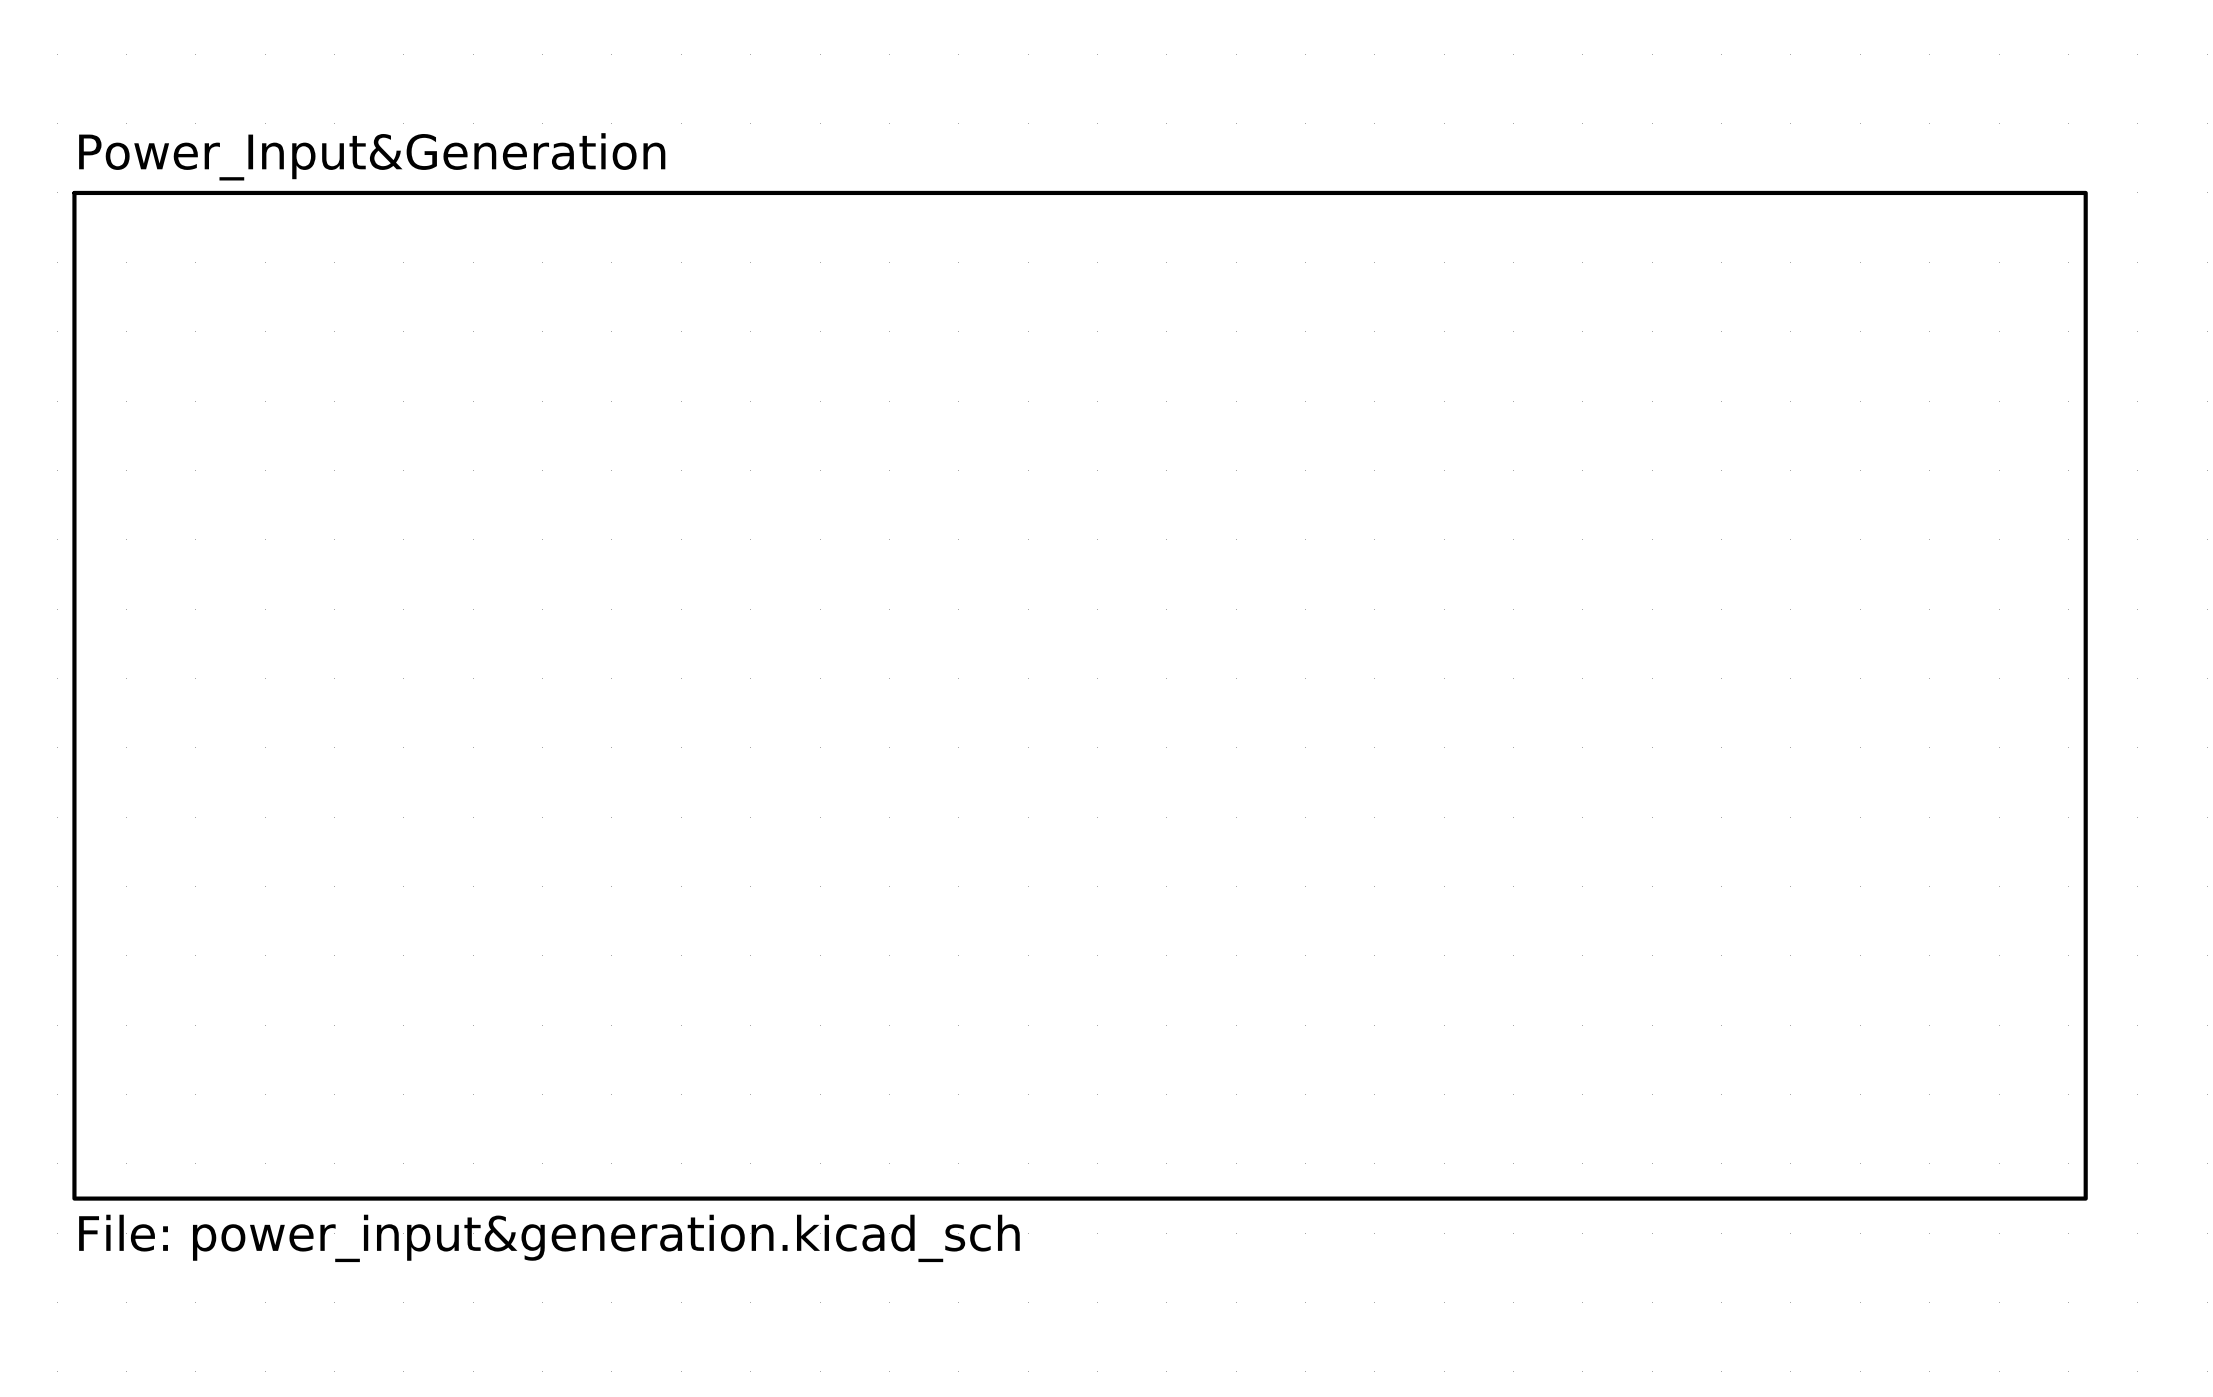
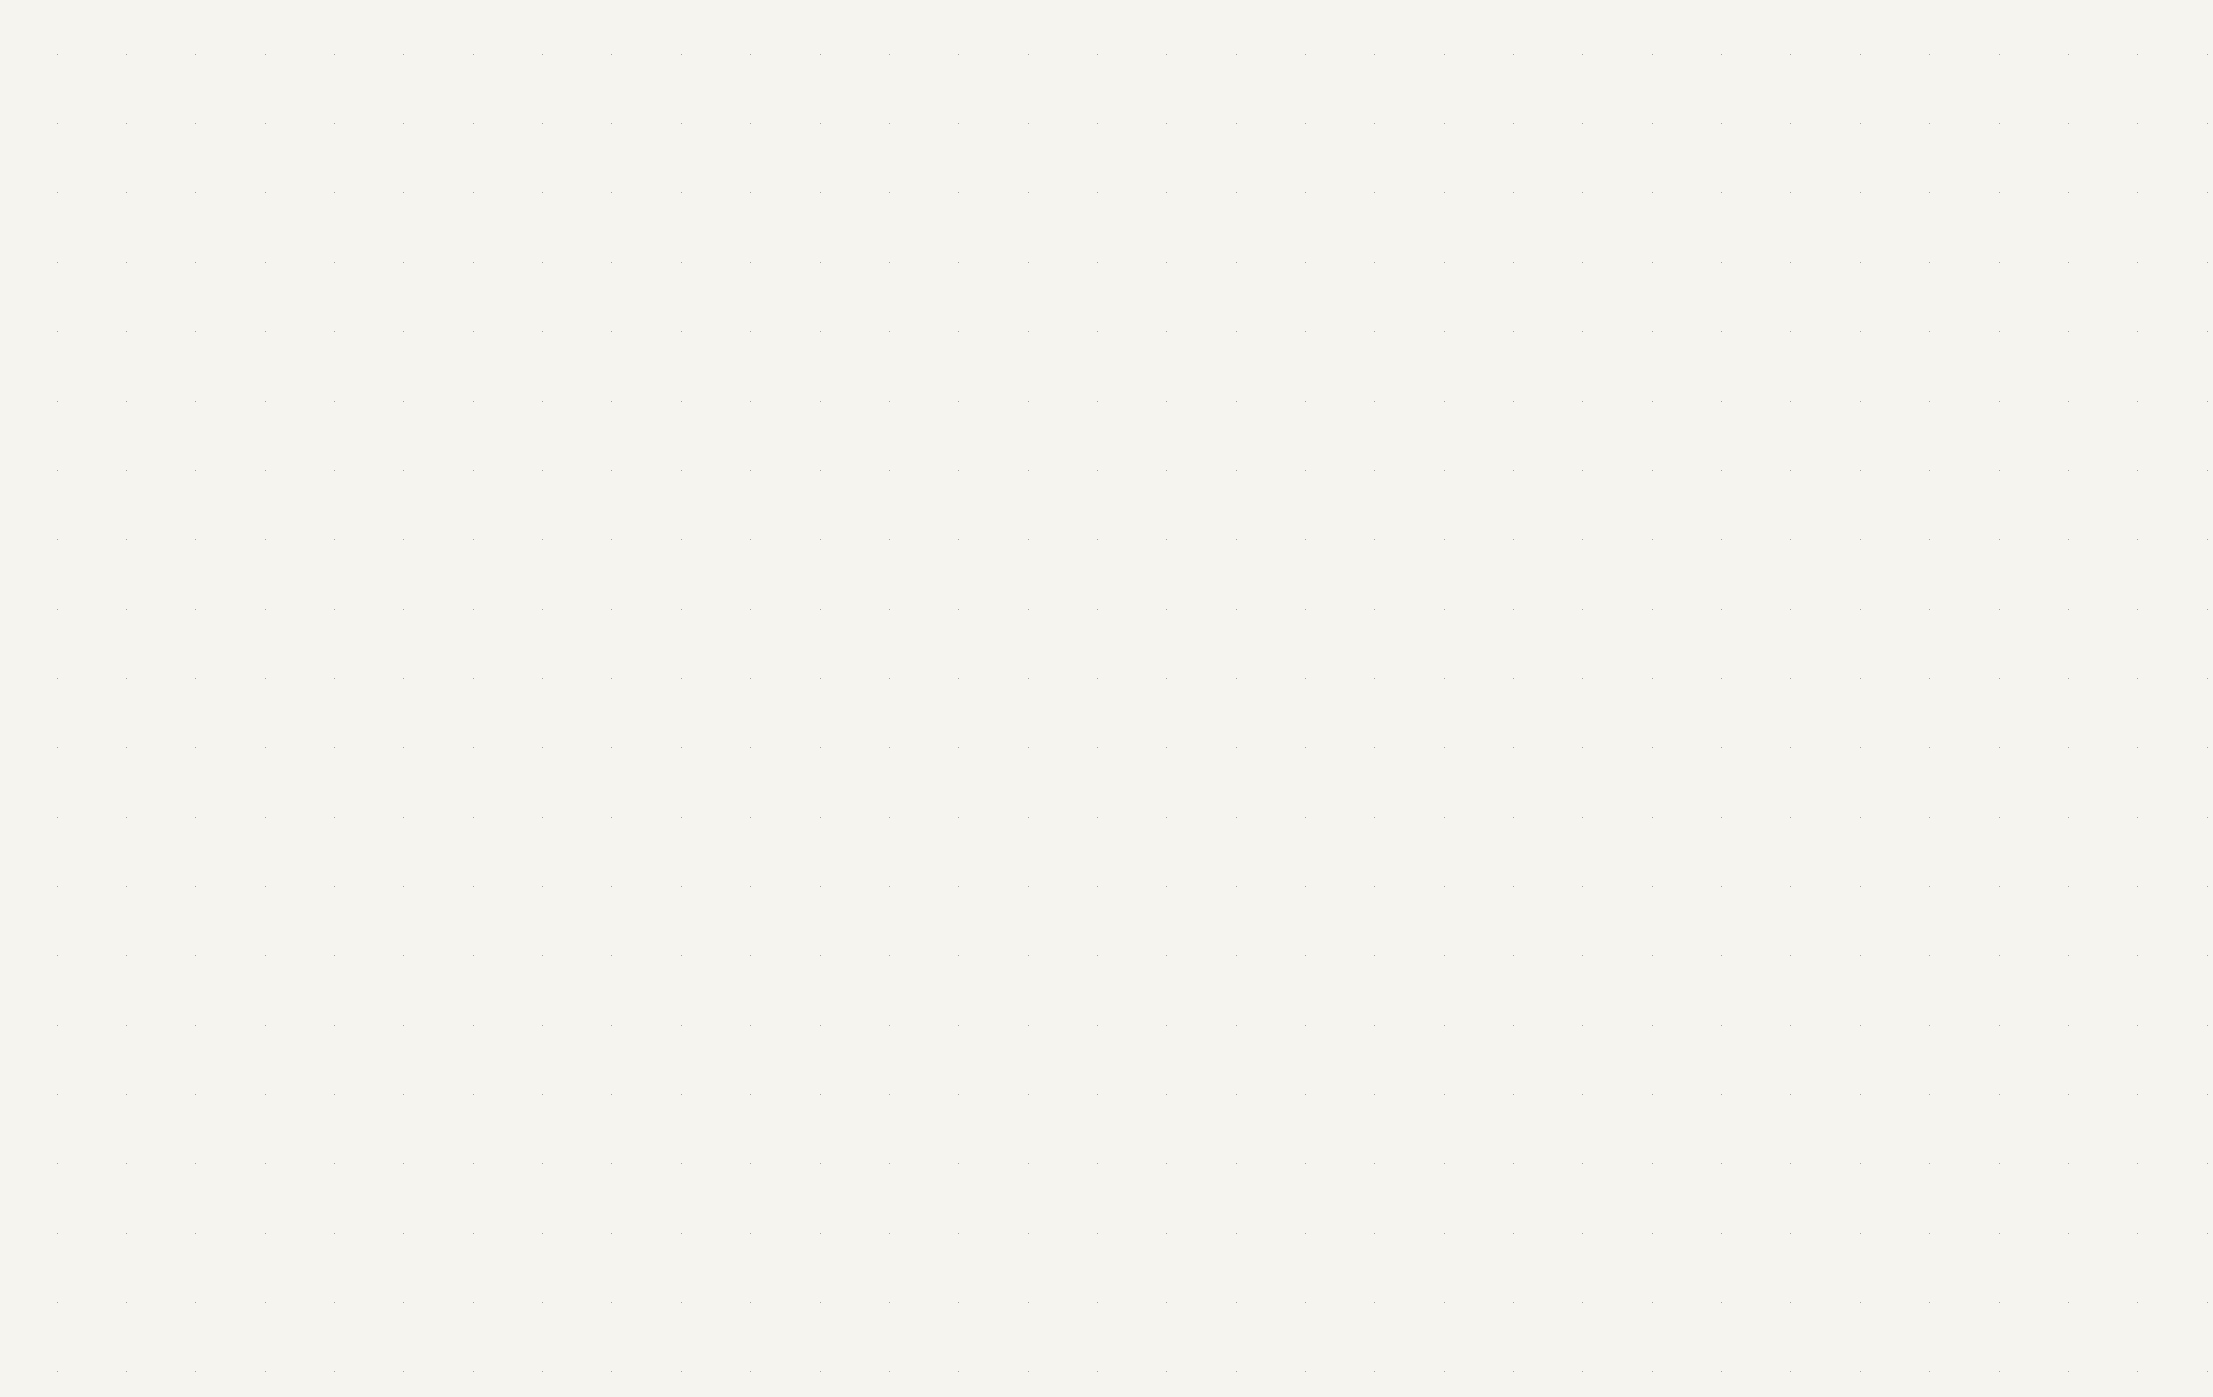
sheet Power_Input&Generation: File: power_input&generation.kicad_sch (1080, 695) -> none

